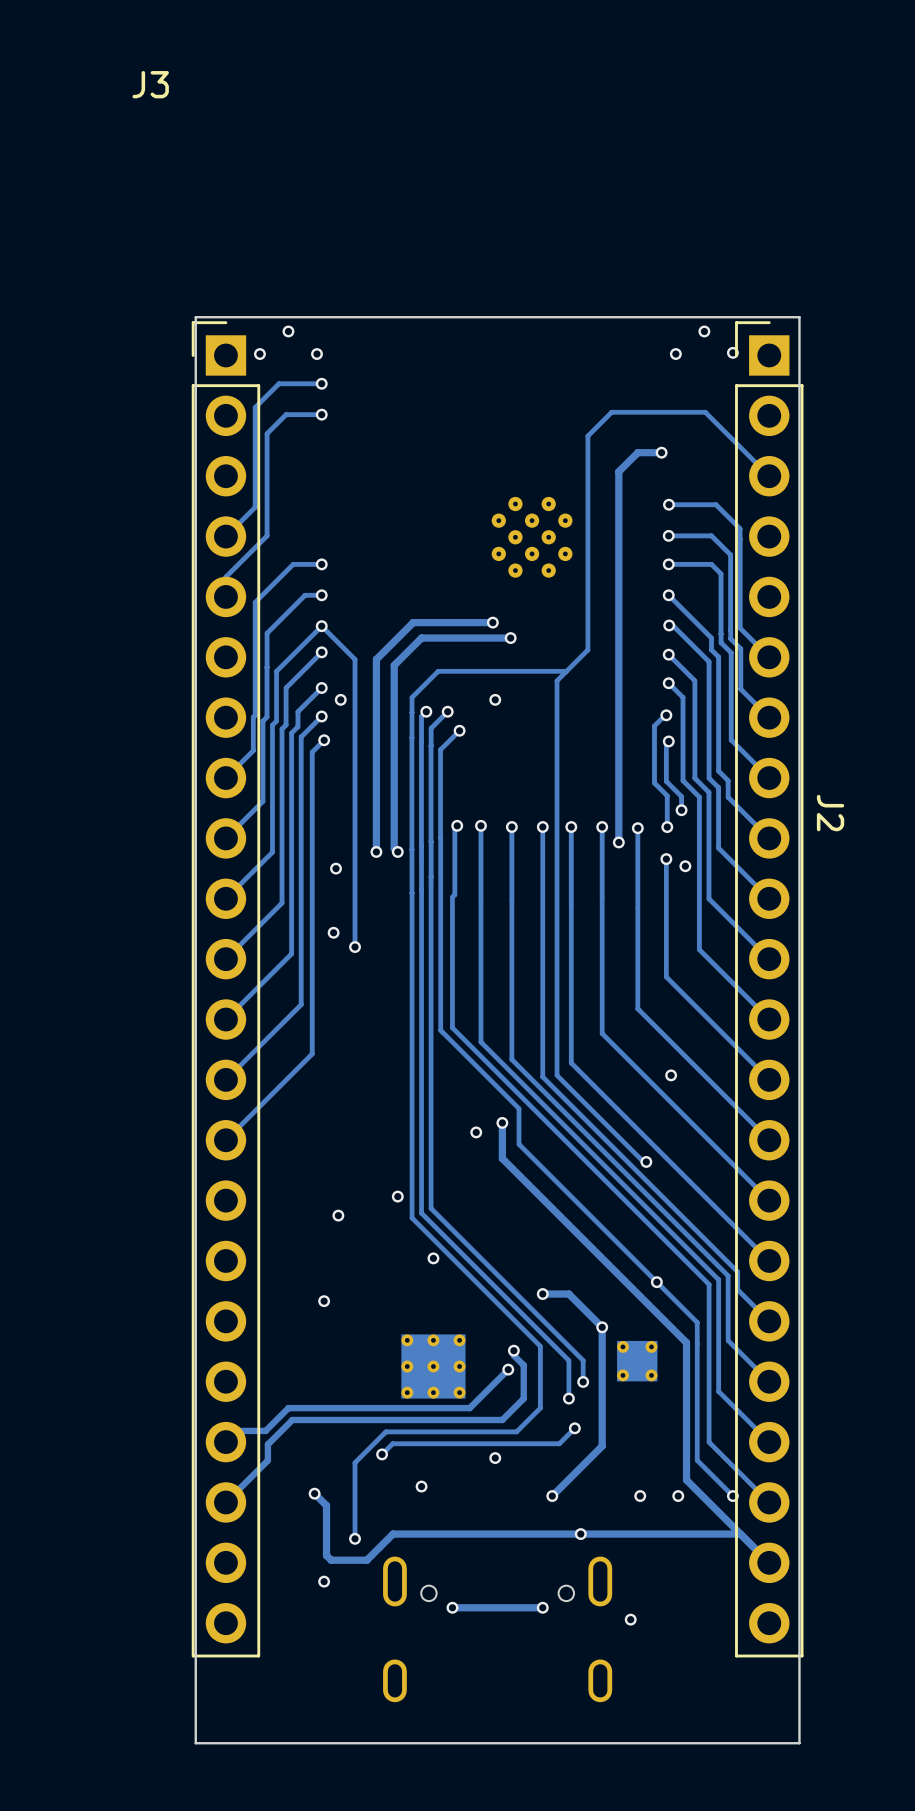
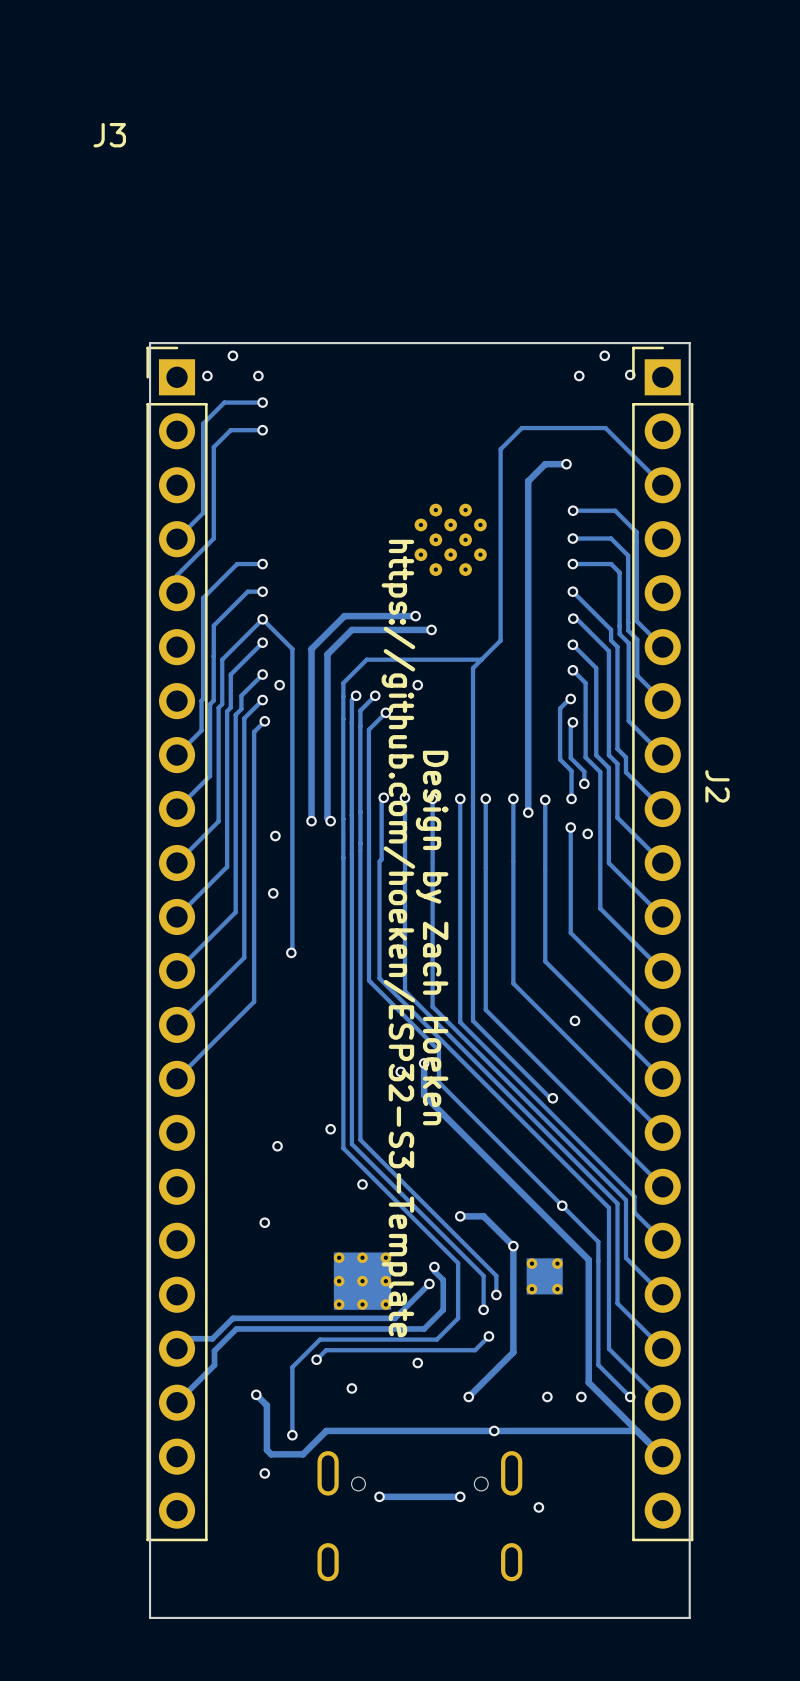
track: none -> (292, 906) (291, 952)
via position: (355, 947) -> (291, 952)
text: none -> Design by Zach Hoeken (432, 938)
text: none -> https://github.com/hoeken/ESP32-S3-Template (398, 938)

